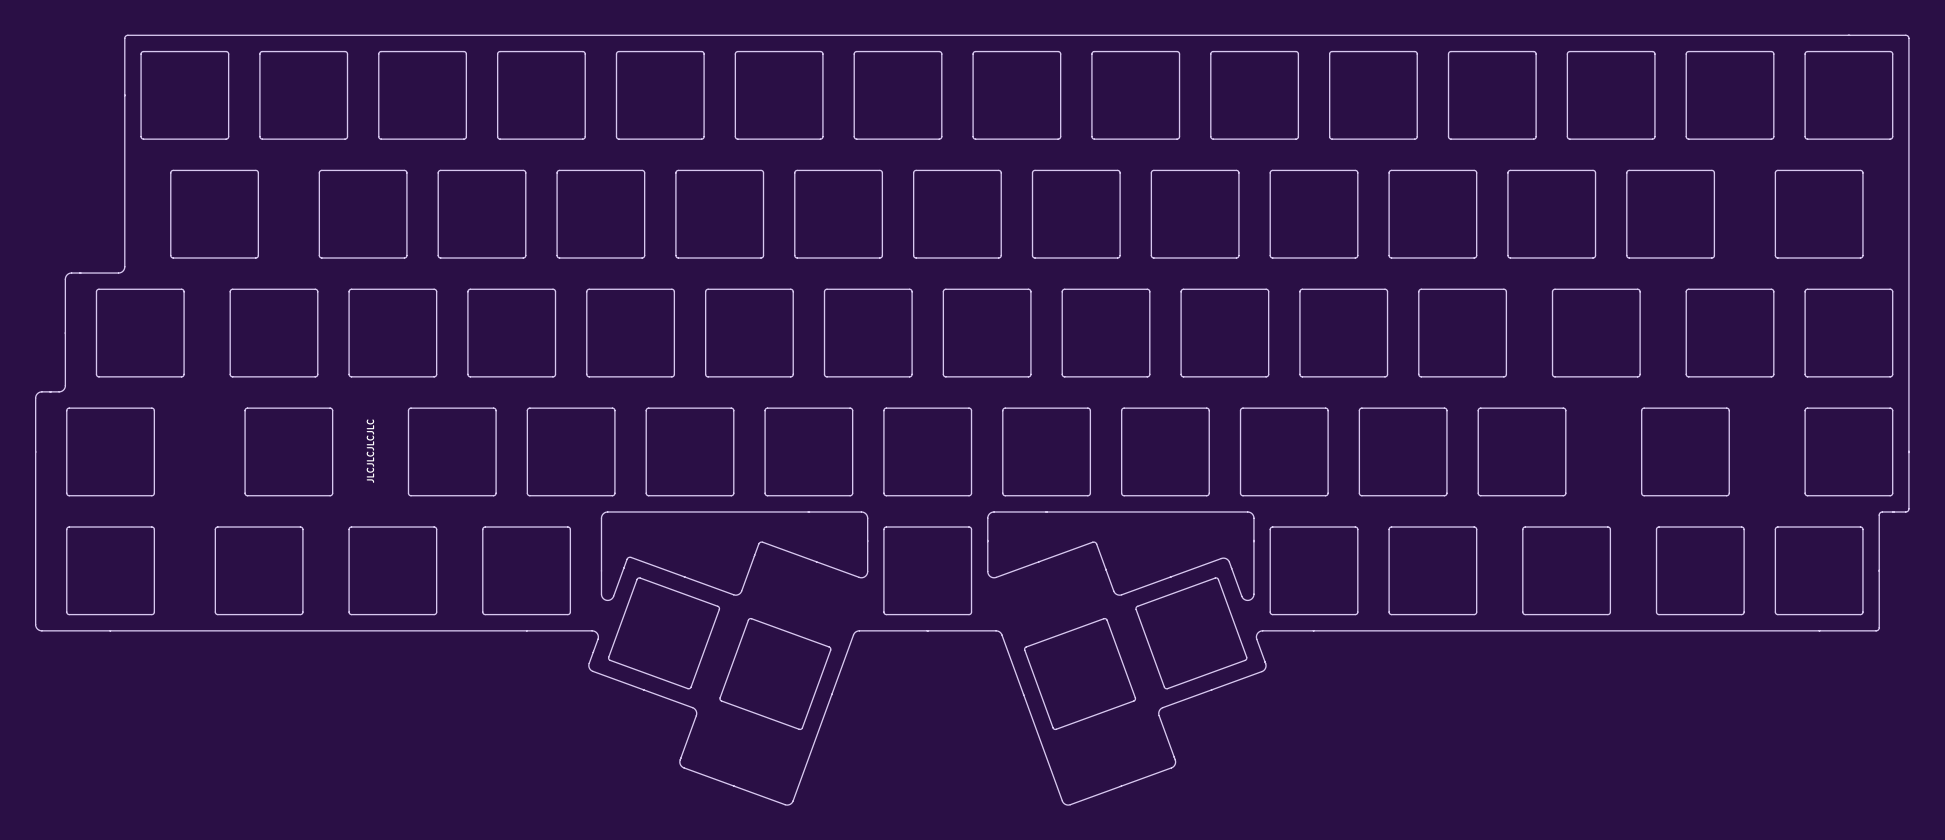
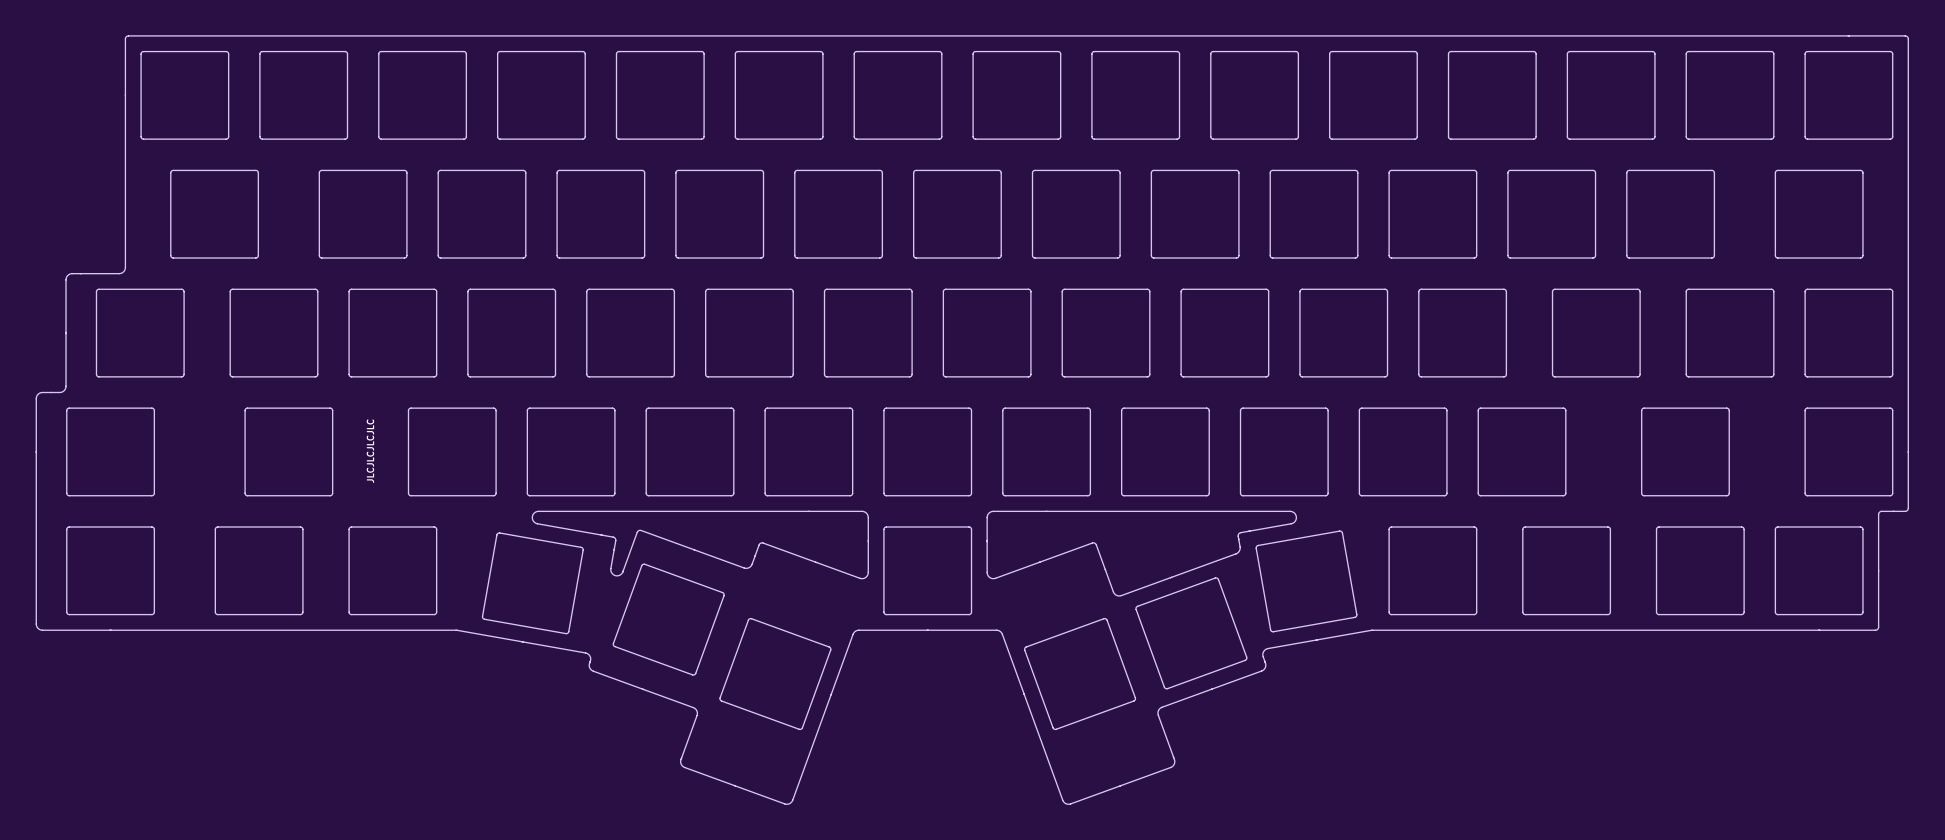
board edge: (607, 511) (862, 512) (867, 517) (867, 573) (864, 577) (859, 577) (761, 542) (758, 544) (741, 591) (737, 594) (630, 557) (627, 559) (613, 597) (606, 600) (601, 594) (601, 518) (603, 513) (607, 511) -> none
board edge: (994, 511) (1249, 512) (1253, 518) (1253, 595) (1248, 600) (1243, 598) (1229, 561) (1223, 558) (1117, 594) (1114, 591) (1096, 544) (1093, 542) (991, 577) (987, 572) (987, 518) (989, 513) (994, 511) -> (993, 511) (988, 513) (987, 517) (987, 572) (989, 577) (995, 578) (1093, 542) (1096, 544) (1113, 592) (1119, 595) (1236, 553) (1240, 549) (1238, 535) (1239, 532) (1291, 523) (1296, 517) (1294, 513) (1290, 511) (993, 511)
drawing: [482, 526, 571, 615] -> none
drawing: [1269, 526, 1359, 615] -> none
drawing: none -> [1255, 530, 1358, 633]
drawing: none -> [482, 532, 584, 635]
board edge: none -> (622, 571) (616, 575) (610, 570) (615, 540) (614, 537) (536, 523) (532, 519) (533, 514) (538, 511) (862, 511) (868, 516) (868, 573) (863, 578) (762, 542) (759, 544) (751, 565) (744, 568) (640, 530) (637, 532) (622, 571)
drawing position: (664, 633) -> (668, 619)
board edge: (1263, 656) (1256, 637) (1258, 632) (1262, 630) (1878, 629) (1879, 514) (1882, 512) (1906, 511) (1908, 508) (1908, 36) (127, 35) (125, 37) (124, 268) (119, 272) (71, 273) (66, 275) (65, 387) (60, 391) (39, 392) (35, 397) (35, 624) (39, 630) (593, 631) (597, 633) (598, 637) (589, 664) (591, 670) (695, 710) (696, 715) (680, 760) (682, 766) (787, 805) (793, 800) (853, 634) (857, 631) (996, 630) (1000, 632) (1062, 800) (1067, 805) (1172, 767) (1175, 760) (1158, 714) (1160, 709) (1262, 671) (1265, 667) (1265, 662) -> (1263, 656) (1263, 652) (1267, 648) (1372, 630) (1877, 629) (1878, 513) (1881, 511) (1905, 511) (1908, 508) (1907, 36) (128, 35) (125, 37) (125, 268) (119, 273) (72, 273) (66, 276) (65, 387) (61, 392) (40, 392) (36, 398) (36, 623) (39, 629) (456, 630) (585, 652) (590, 656) (589, 666) (592, 670) (696, 709) (697, 714) (680, 760) (682, 766) (786, 804) (792, 800) (853, 634) (857, 630) (996, 630) (1000, 631) (1062, 800) (1067, 804) (1171, 766) (1174, 760) (1158, 714) (1159, 708) (1261, 671) (1265, 667) (1265, 662)

